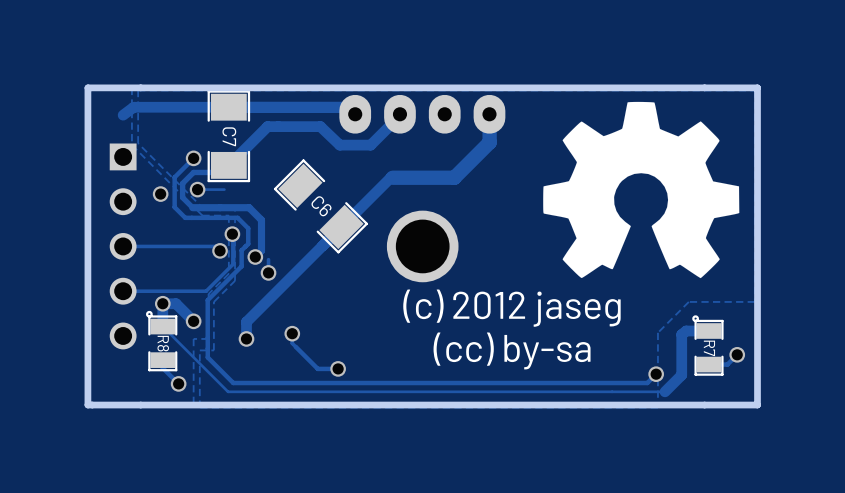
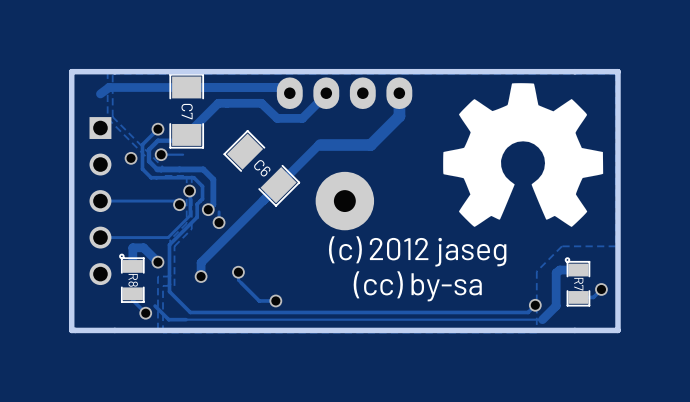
part footprint: [386, 210, 459, 283] -> [315, 171, 375, 231]
via: (162, 303) -> none
track: (162, 326) (228, 391) -> (155, 306) (168, 319) (186, 319)

